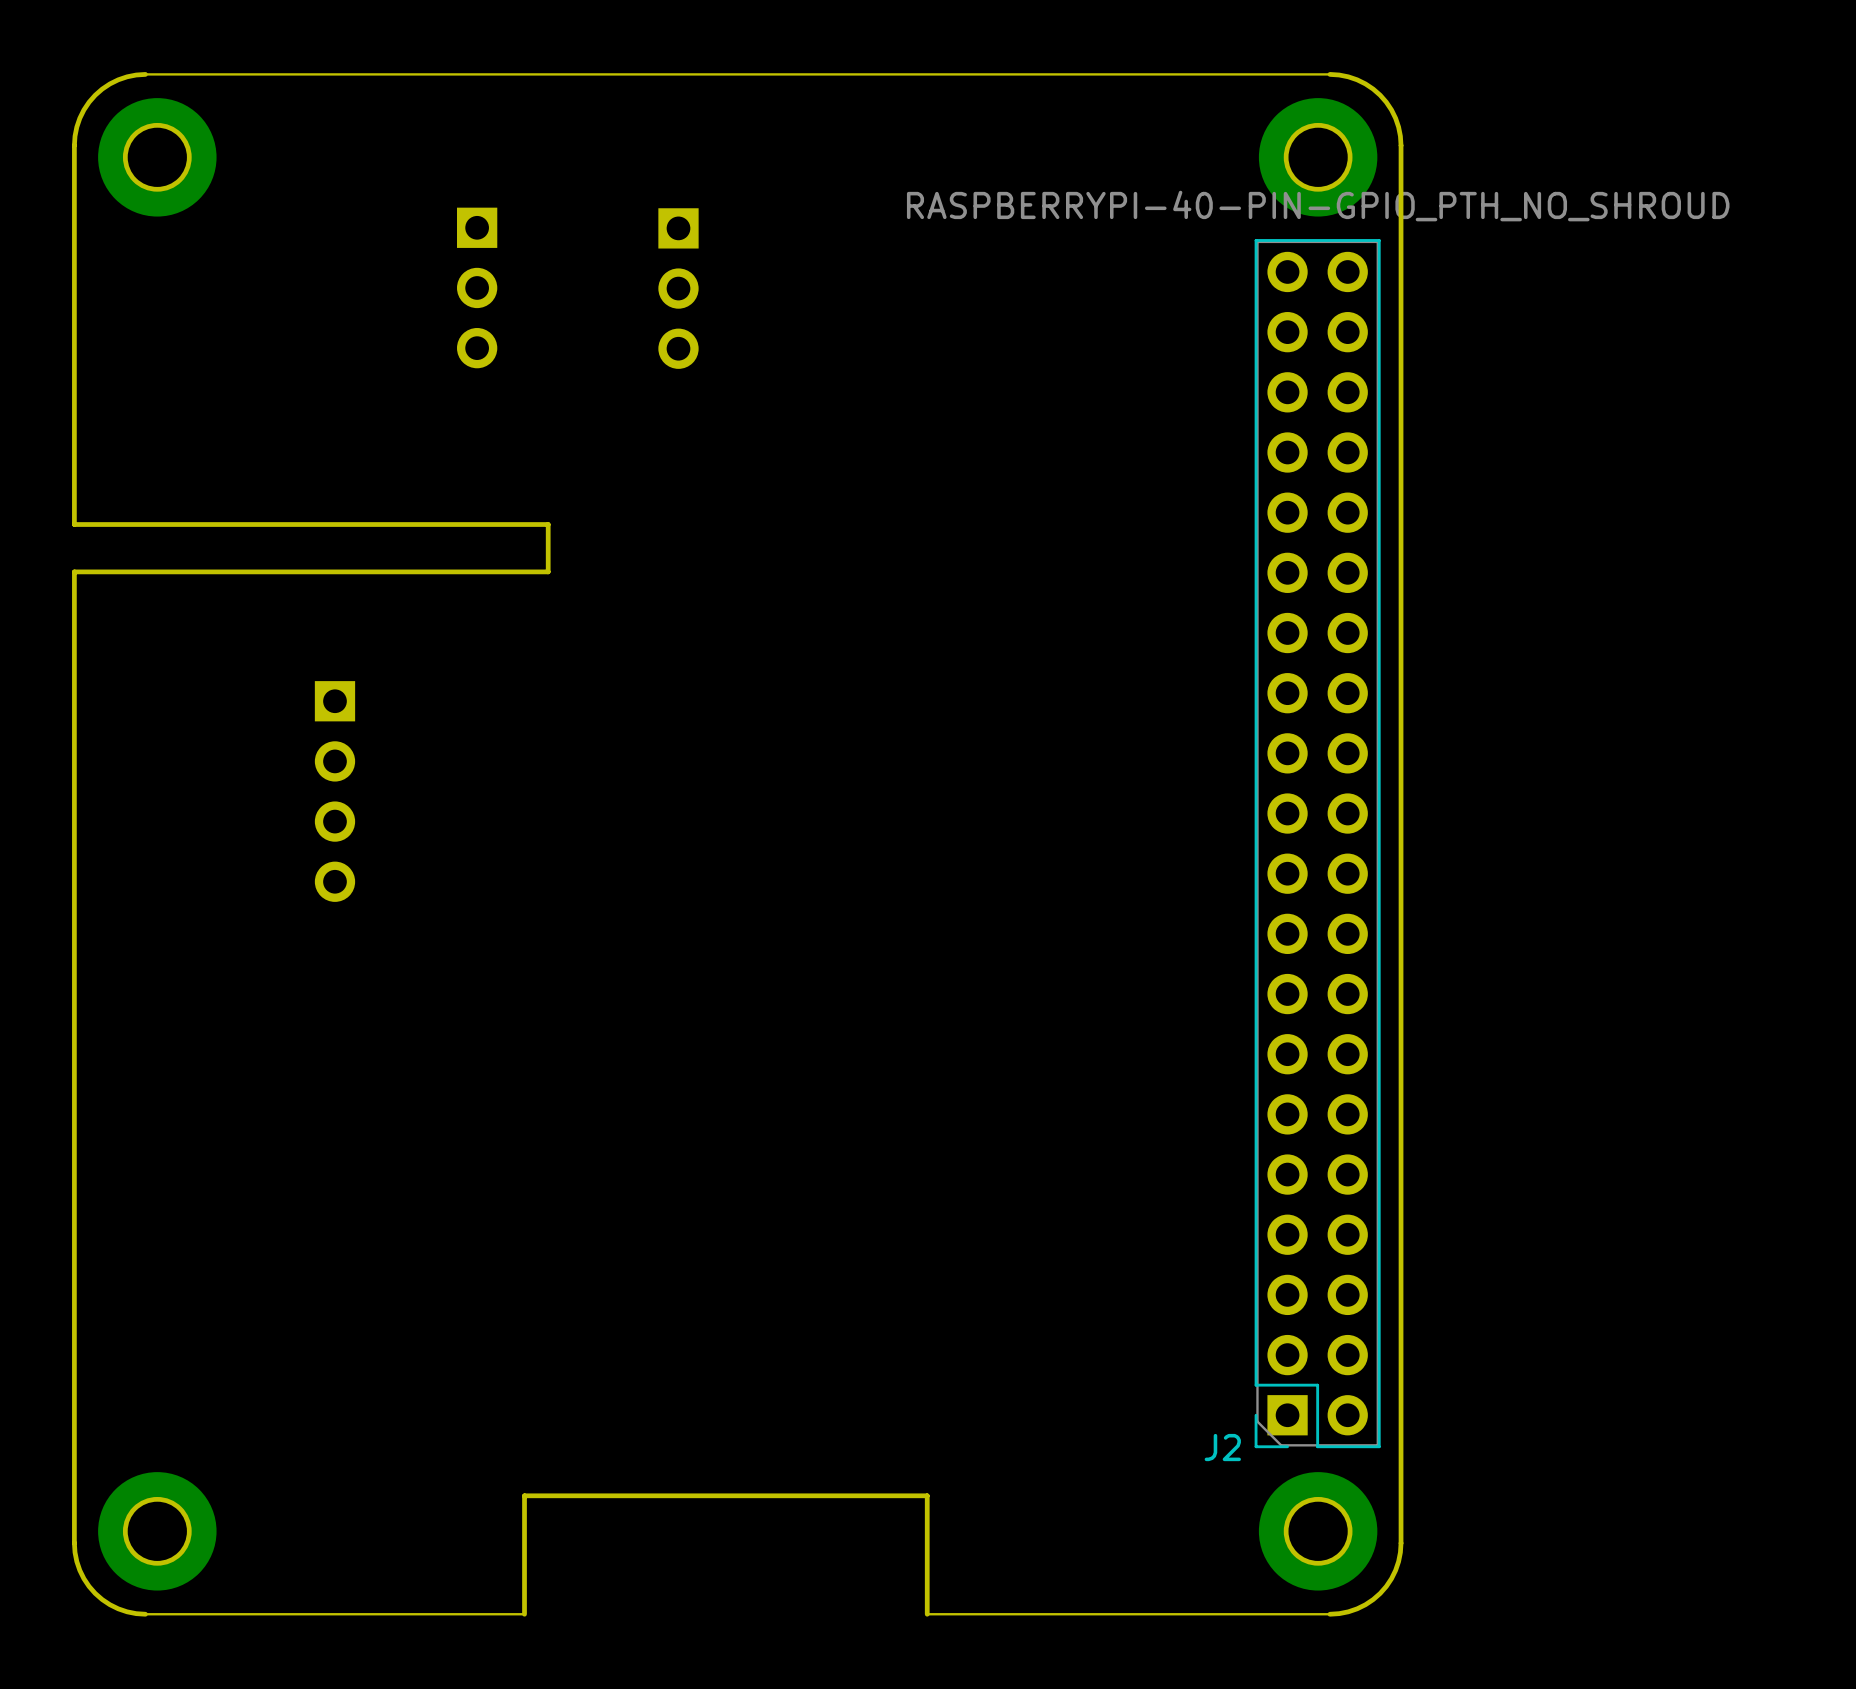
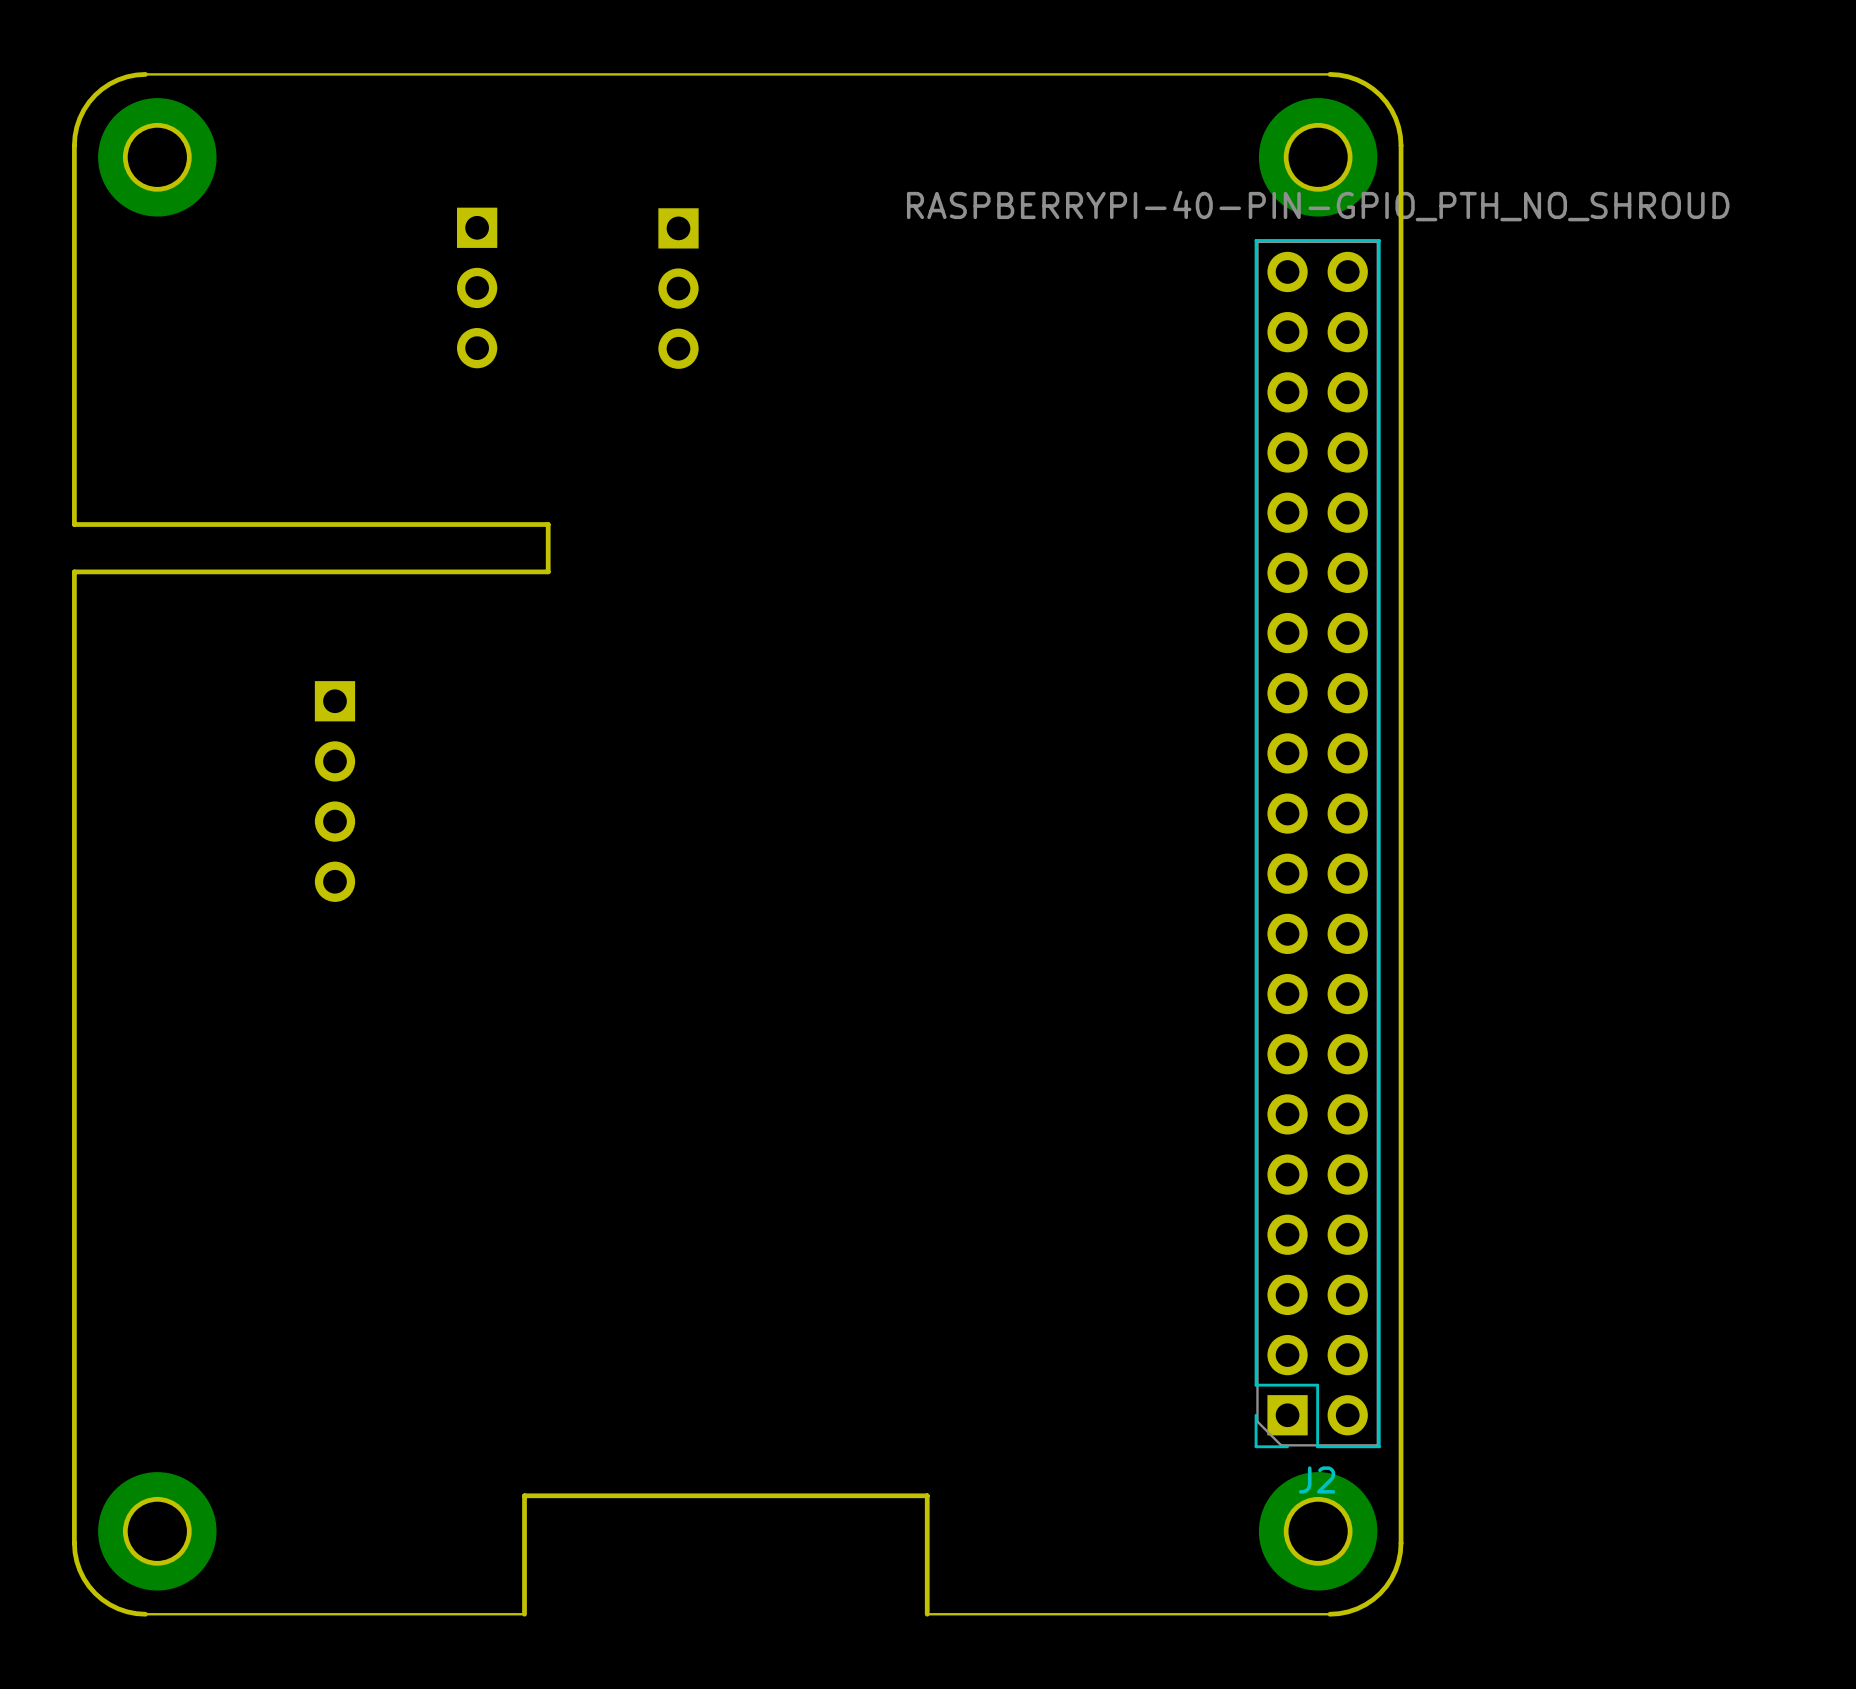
J2 name position: J2 (1222, 1447) -> J2 (1317, 1479)

